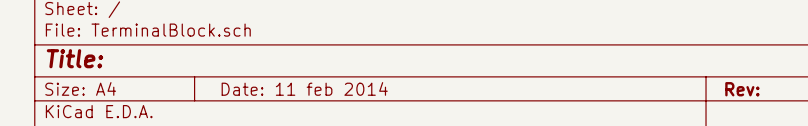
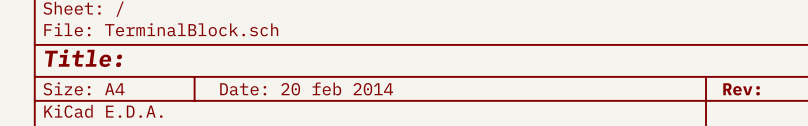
title block: Date: 11 feb 2014 (304, 88) -> Date: 20 feb 2014 (306, 88)

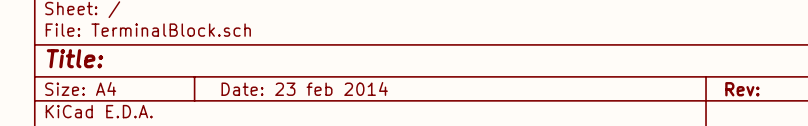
title block: Date: 20 feb 2014 (306, 88) -> Date: 23 feb 2014 (304, 88)

